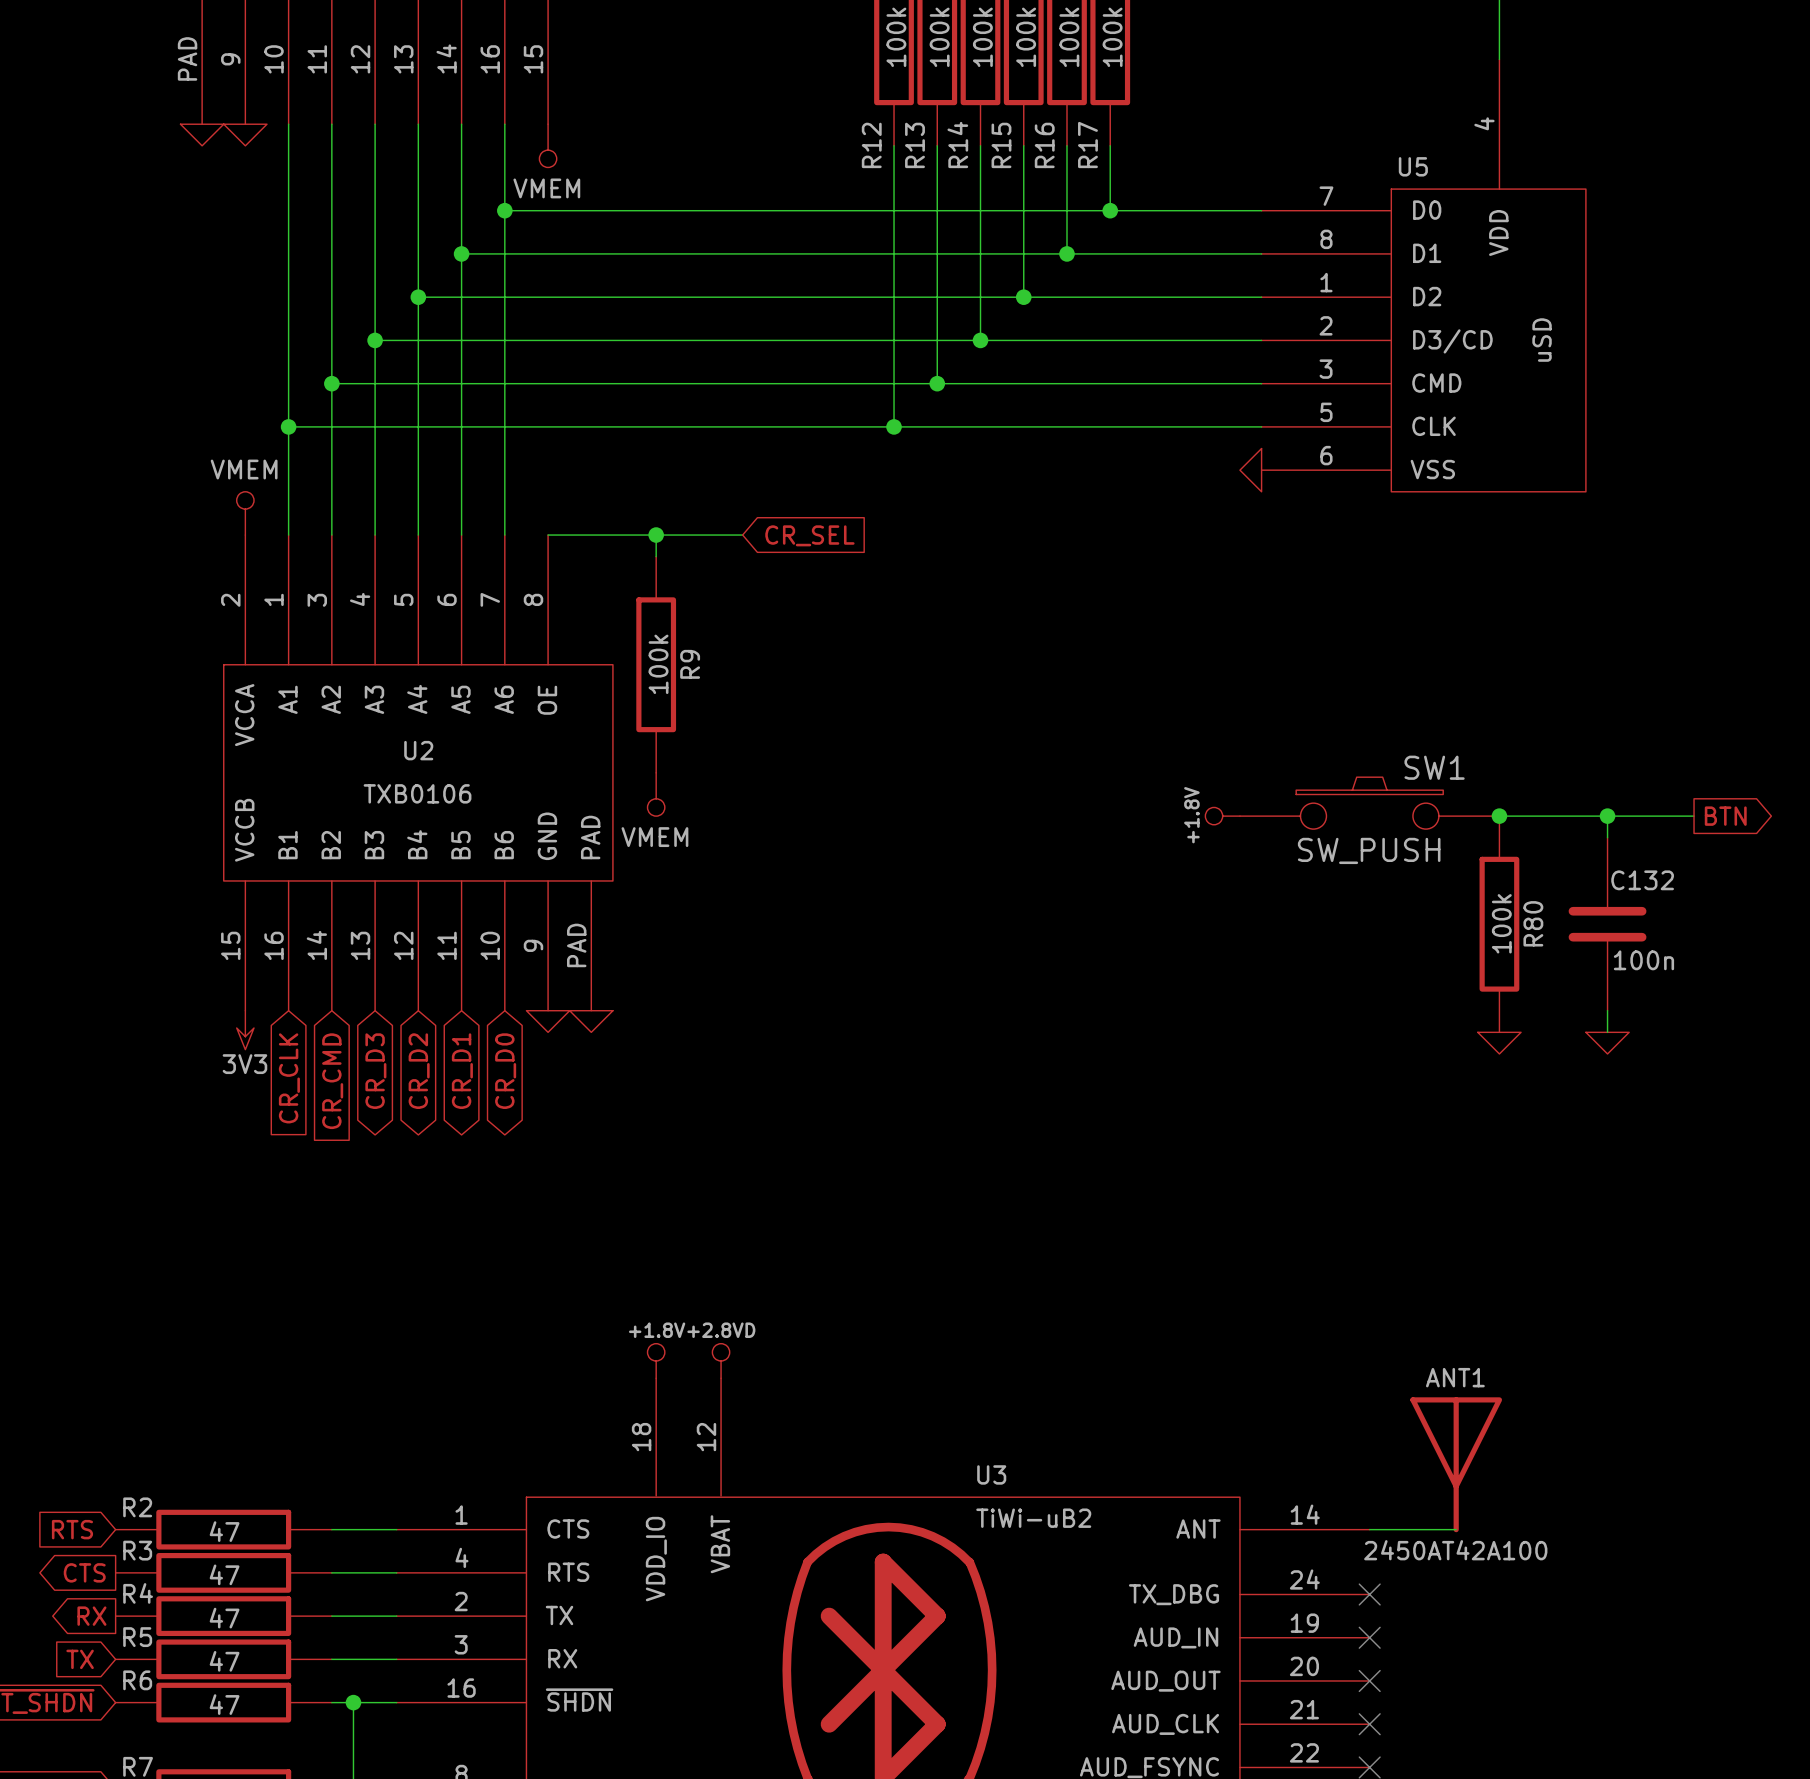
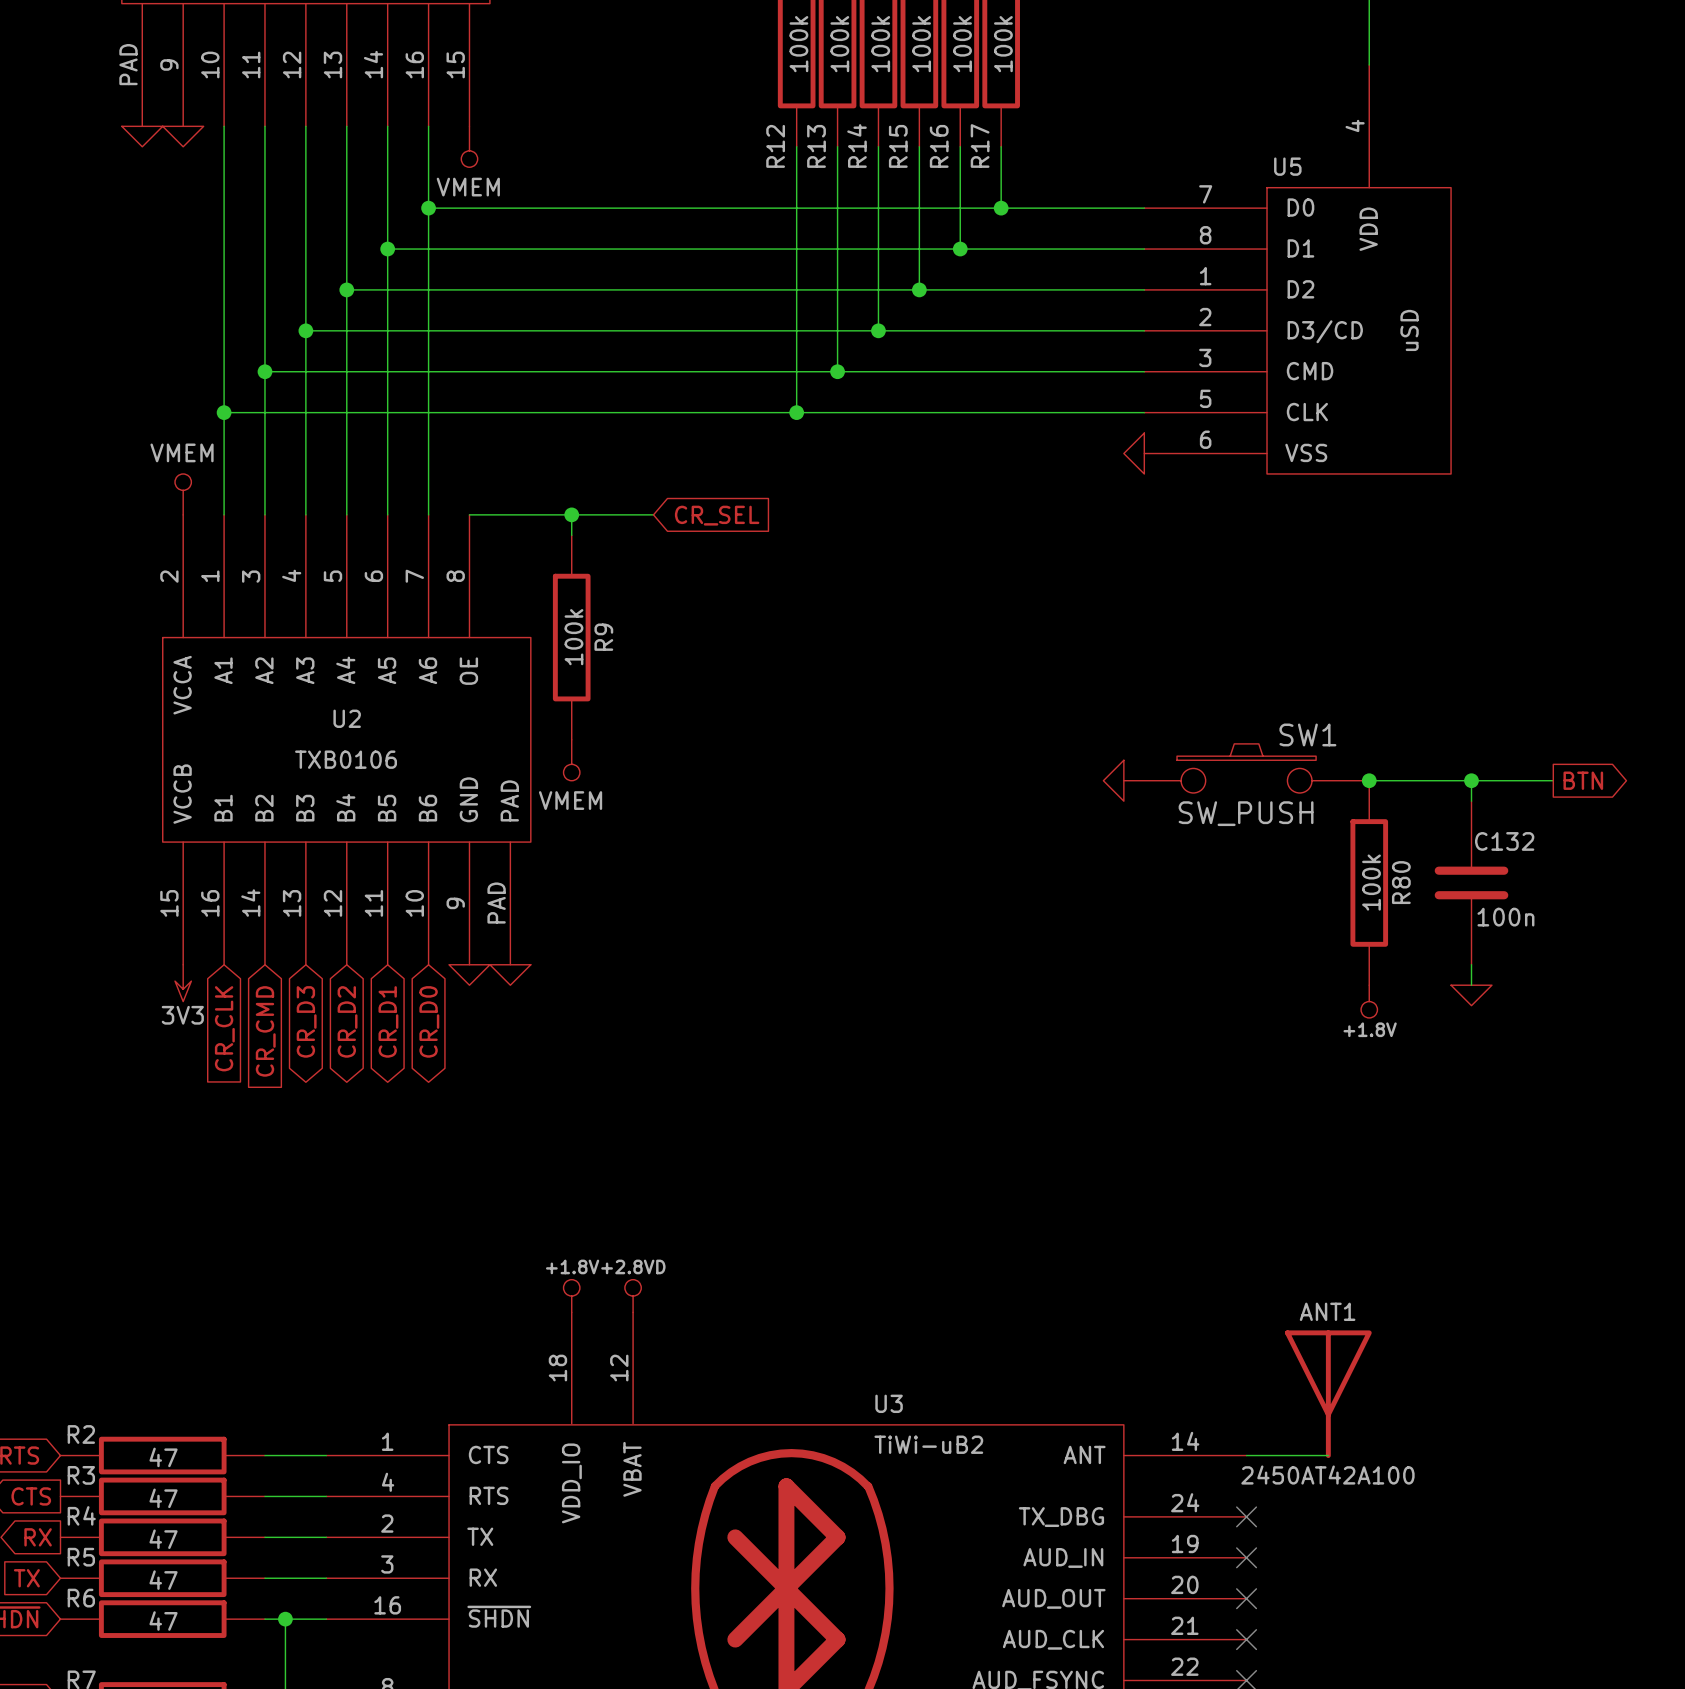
power symbol shape: [1205, 807, 1240, 825] -> [1103, 760, 1124, 802]
power symbol text: +1.8V (1191, 815) -> none
power symbol shape: [1477, 1032, 1522, 1054] -> [1361, 985, 1378, 1018]
power symbol text: none -> +1.8V (1370, 1029)

